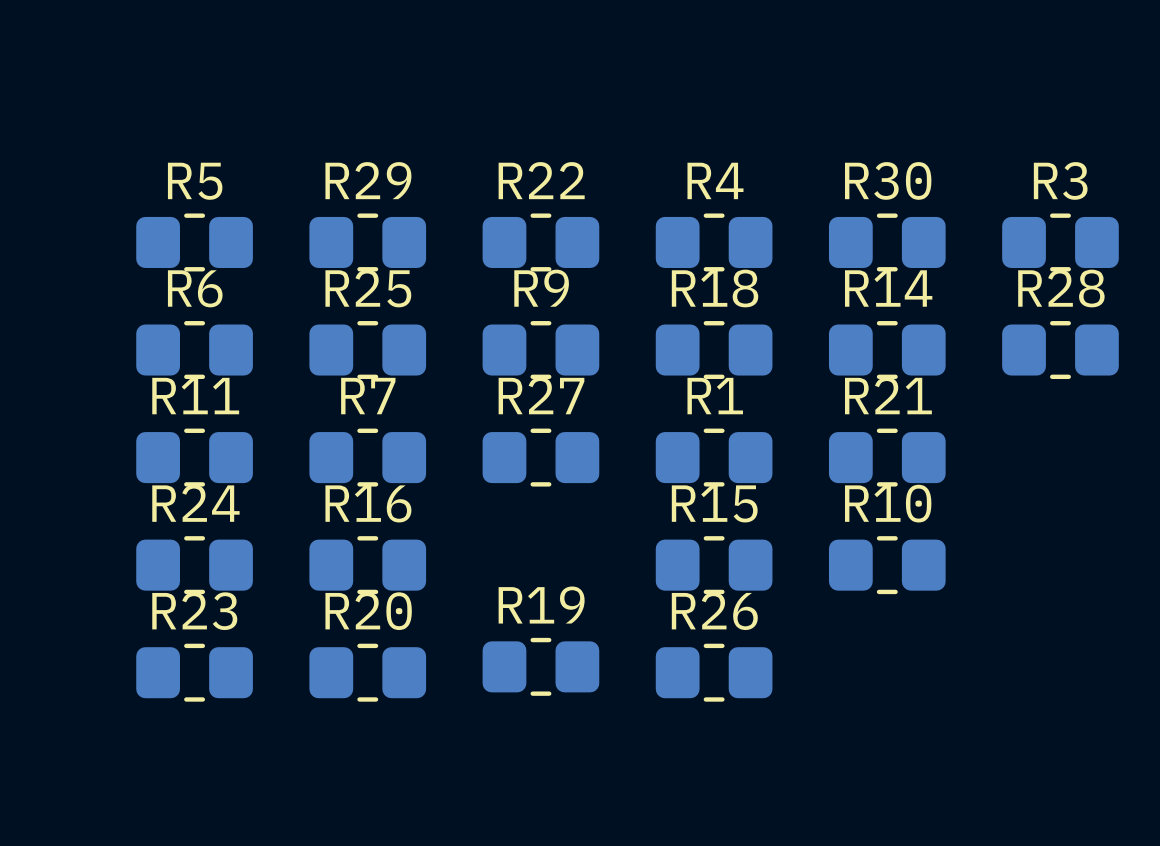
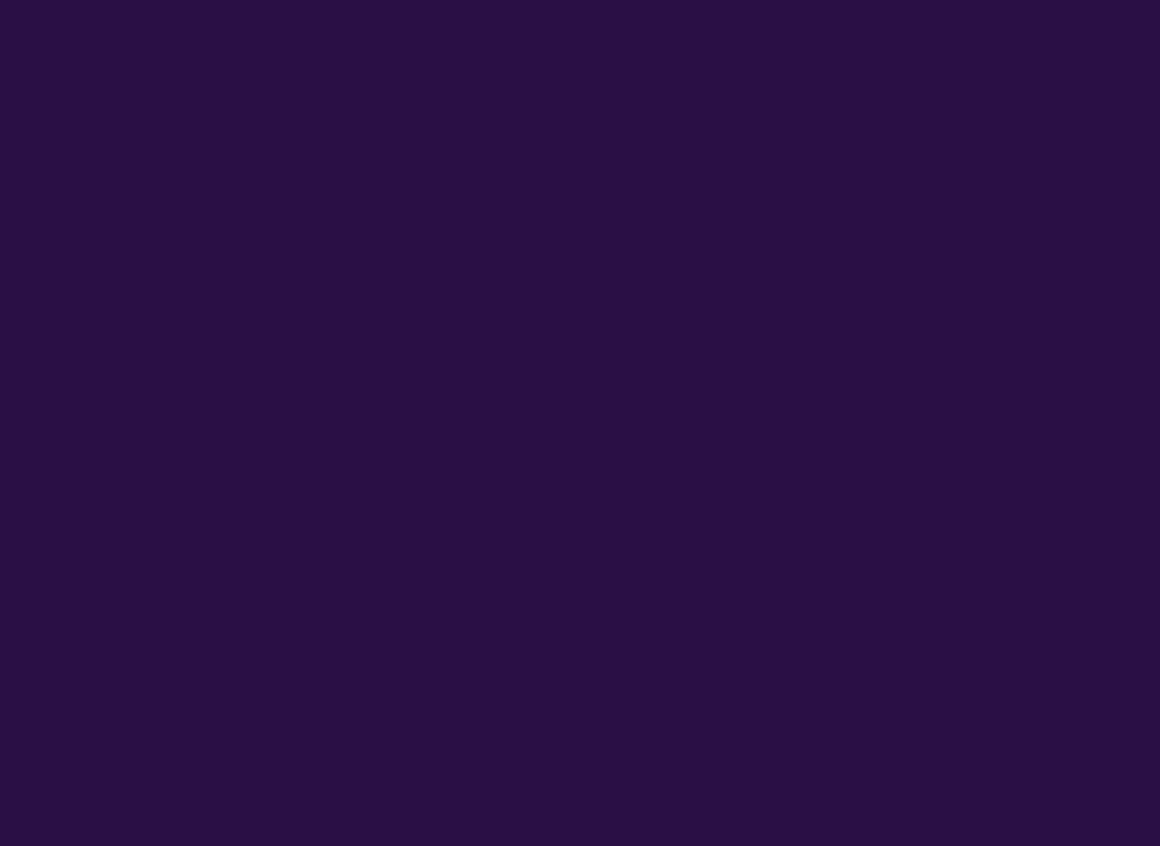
R5: (194, 242) -> none
R29: (367, 242) -> none
R22: (540, 242) -> none
R4: (714, 242) -> none
R30: (887, 242) -> none
R3: (1060, 242) -> none
R6: (194, 350) -> none
R25: (367, 350) -> none
R9: (540, 350) -> none
R18: (714, 350) -> none
R14: (887, 350) -> none
R28: (1060, 350) -> none
R11: (194, 457) -> none
R7: (367, 457) -> none
R27: (540, 457) -> none
R1: (714, 457) -> none
R21: (887, 457) -> none
R24: (194, 565) -> none
R16: (367, 565) -> none
R15: (714, 565) -> none
R10: (887, 565) -> none
R19: (540, 666) -> none
R23: (194, 672) -> none
R20: (367, 672) -> none
R26: (714, 672) -> none

